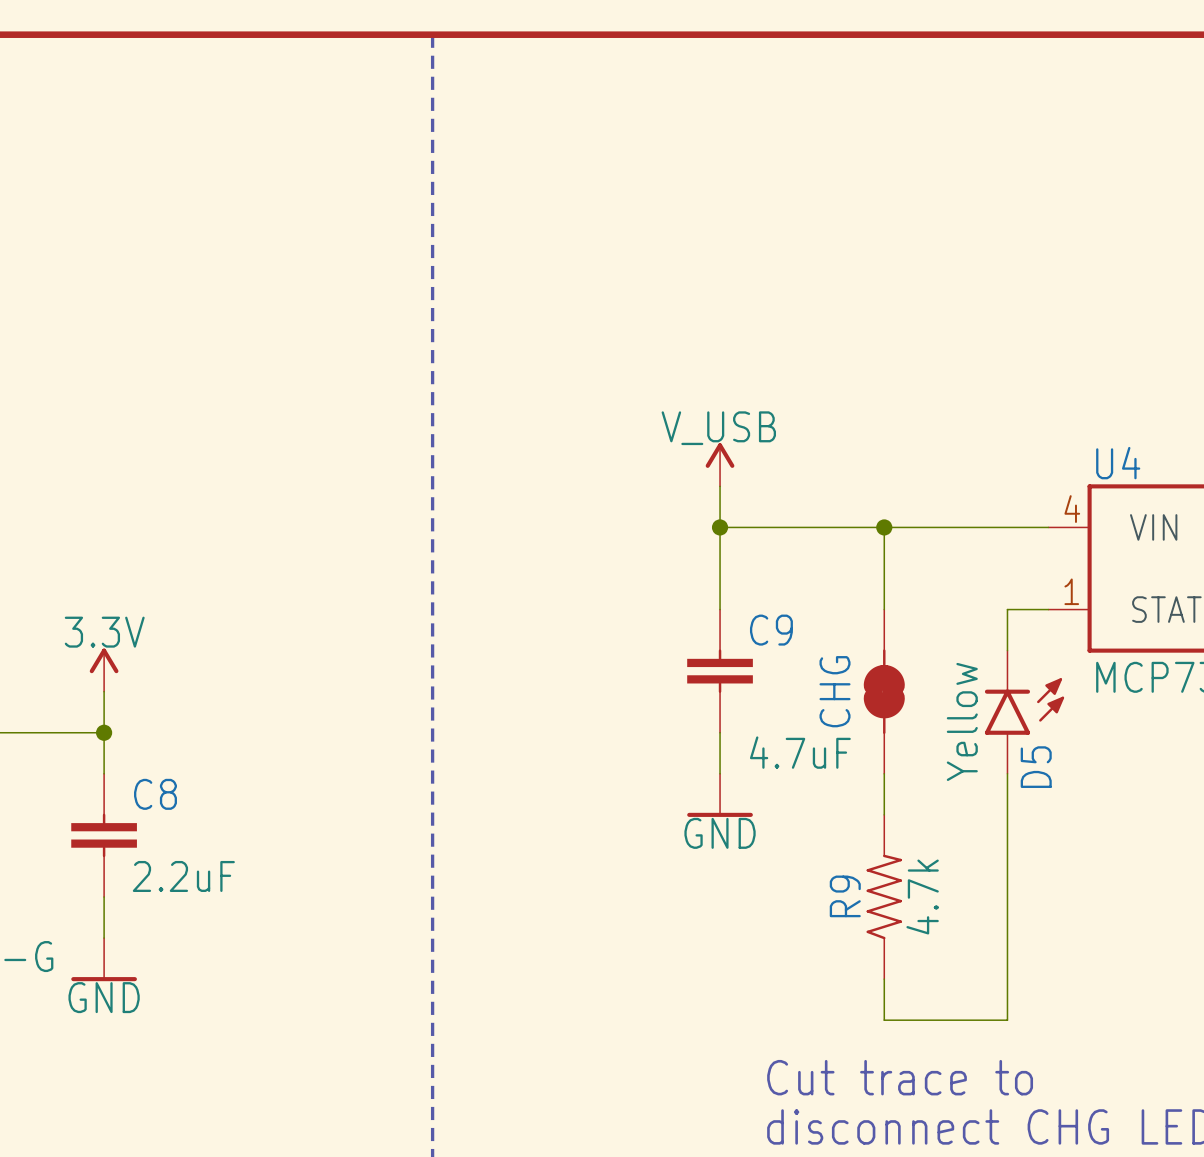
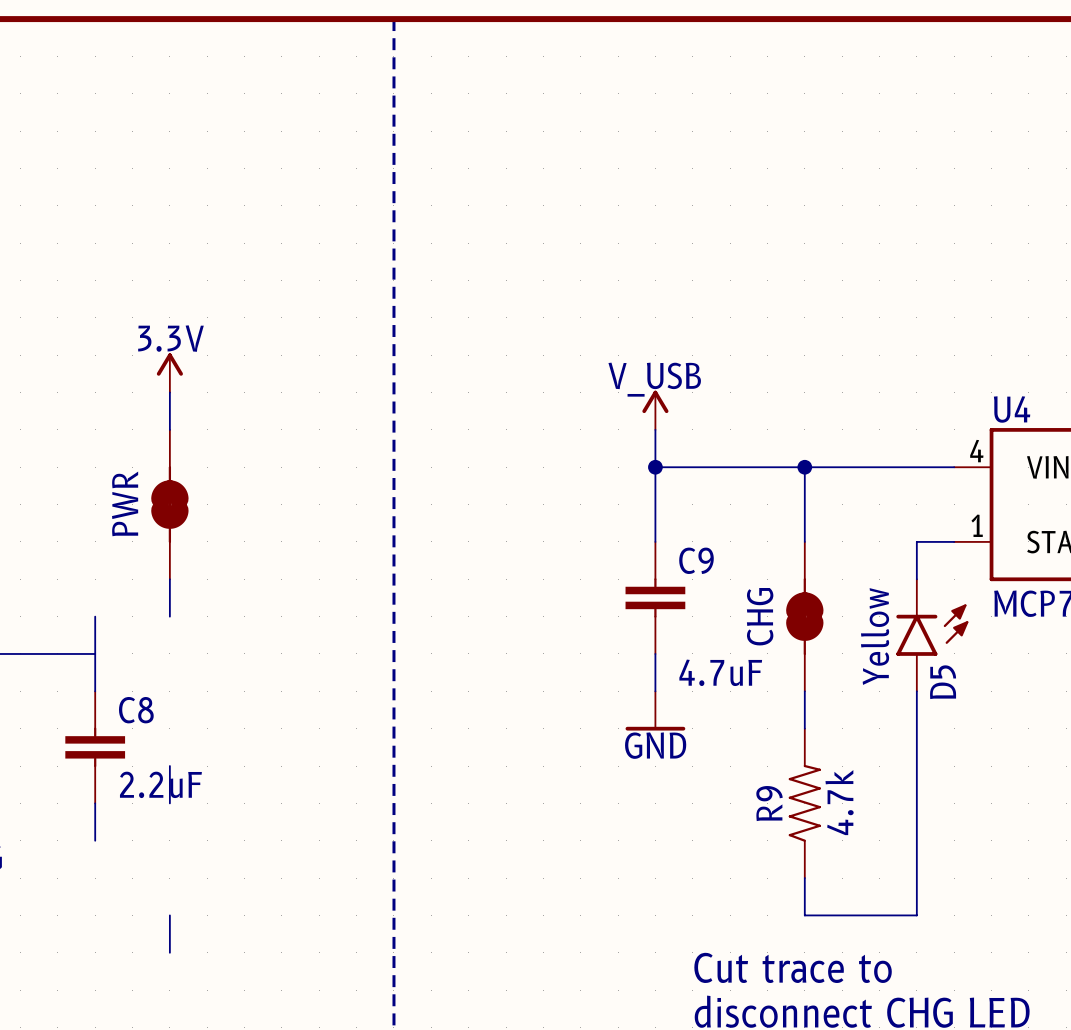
wire: none -> (169, 392) (169, 429)
PWR: none -> (169, 504)
wire: none -> (169, 579) (169, 616)
power symbol position: 3.3V (104, 670) -> 3.3V (169, 372)
junction: (104, 732) -> none
wire: none -> (169, 766) (169, 803)
power symbol: GND (104, 959) -> none
wire: none -> (169, 915) (169, 952)

